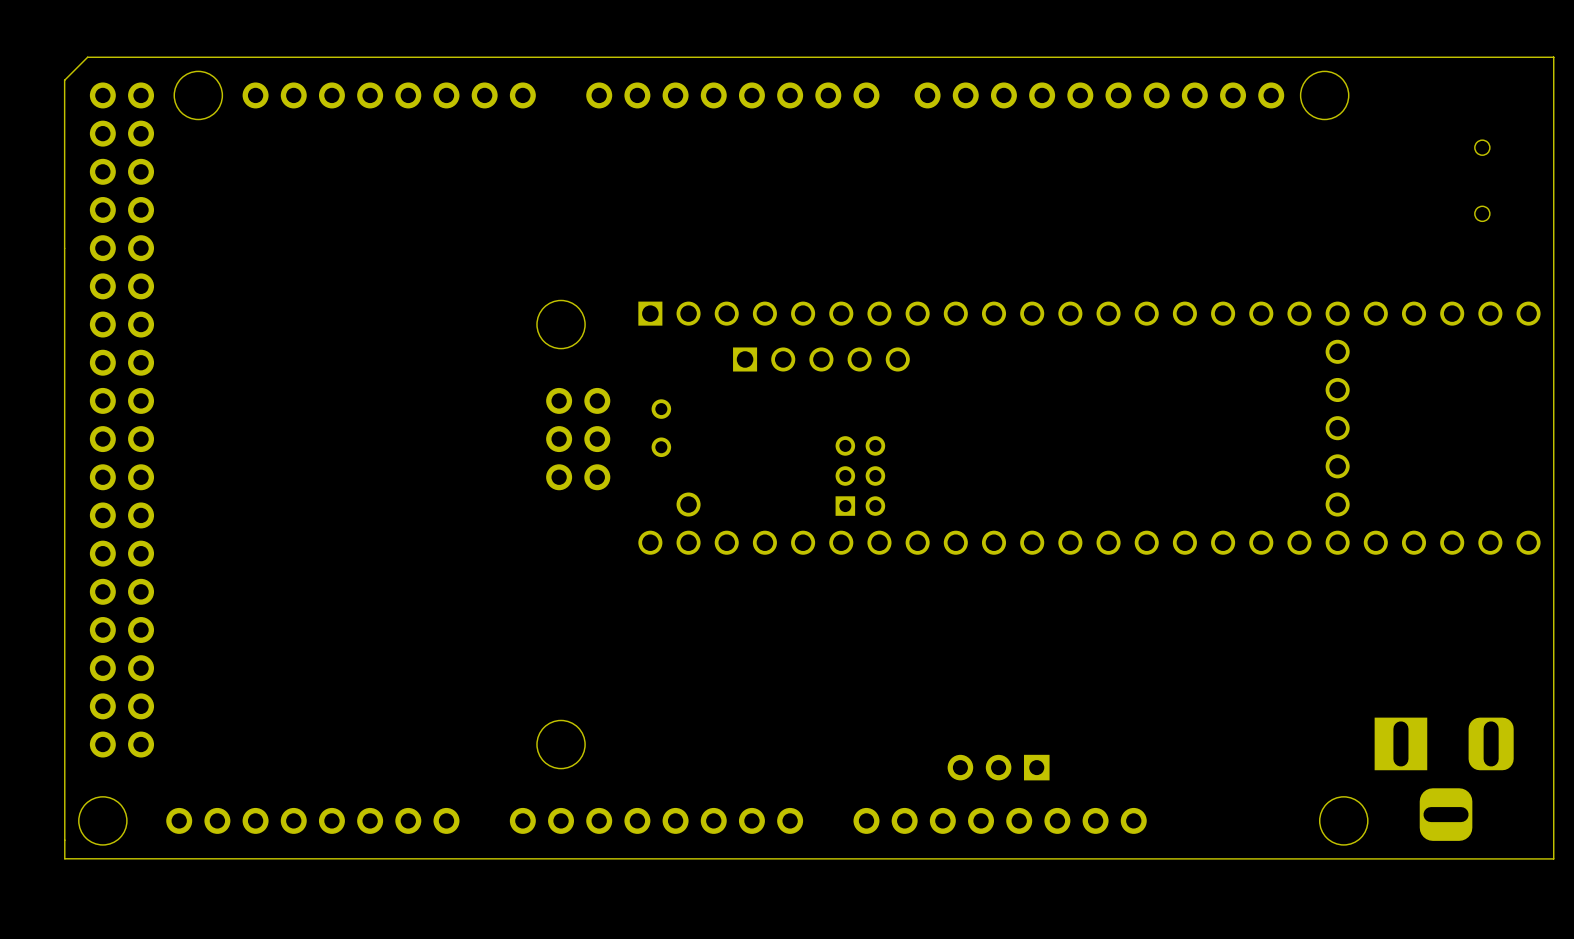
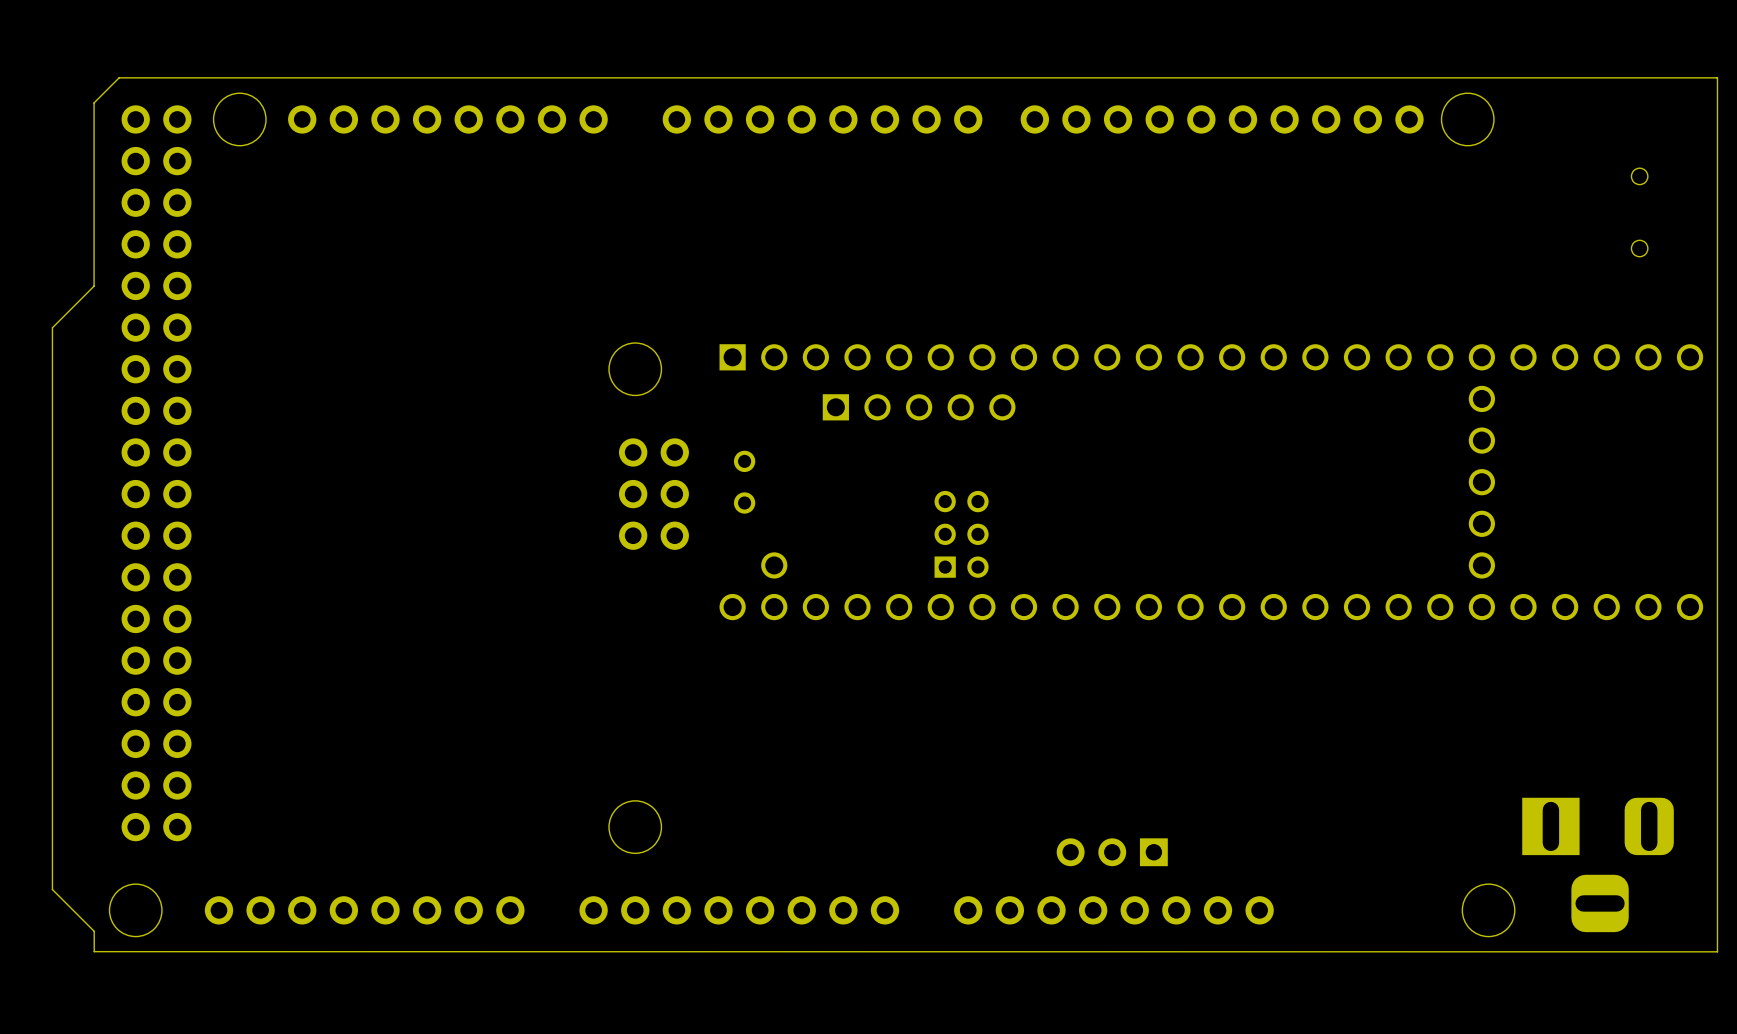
board edge: (64, 248) (64, 840) -> (94, 286) (52, 327) (52, 889) (94, 931)

